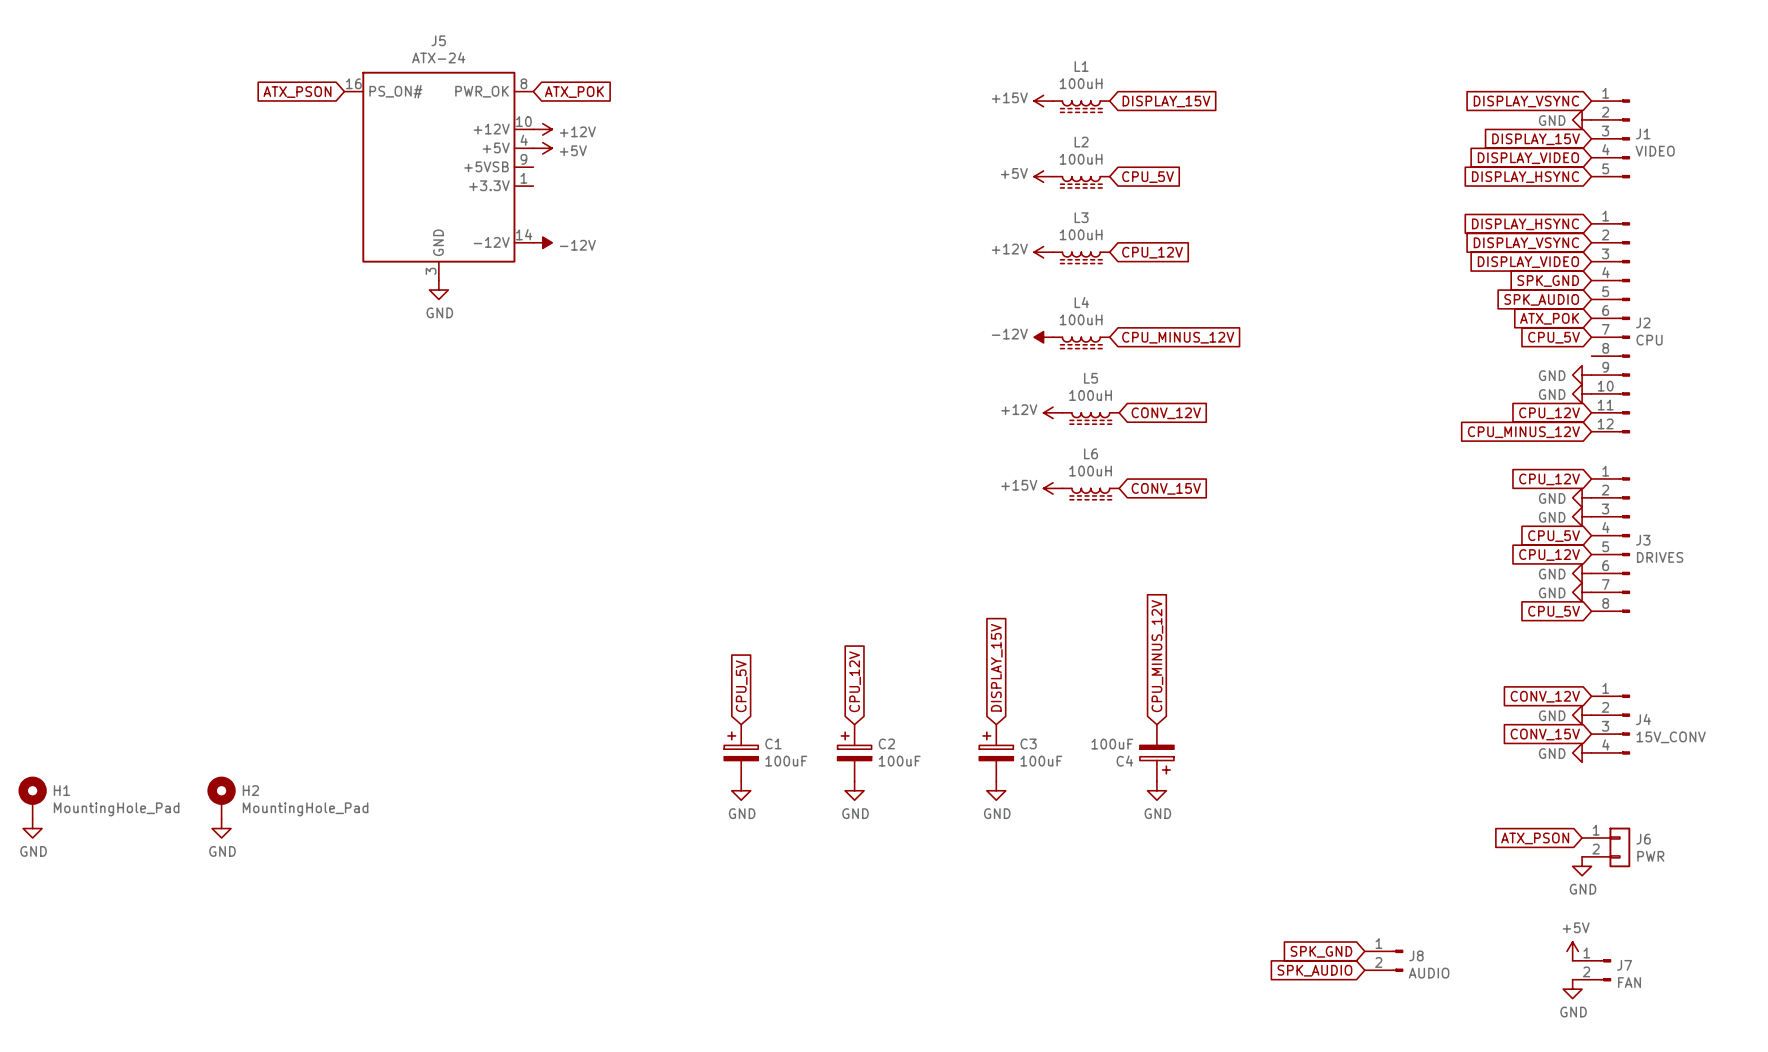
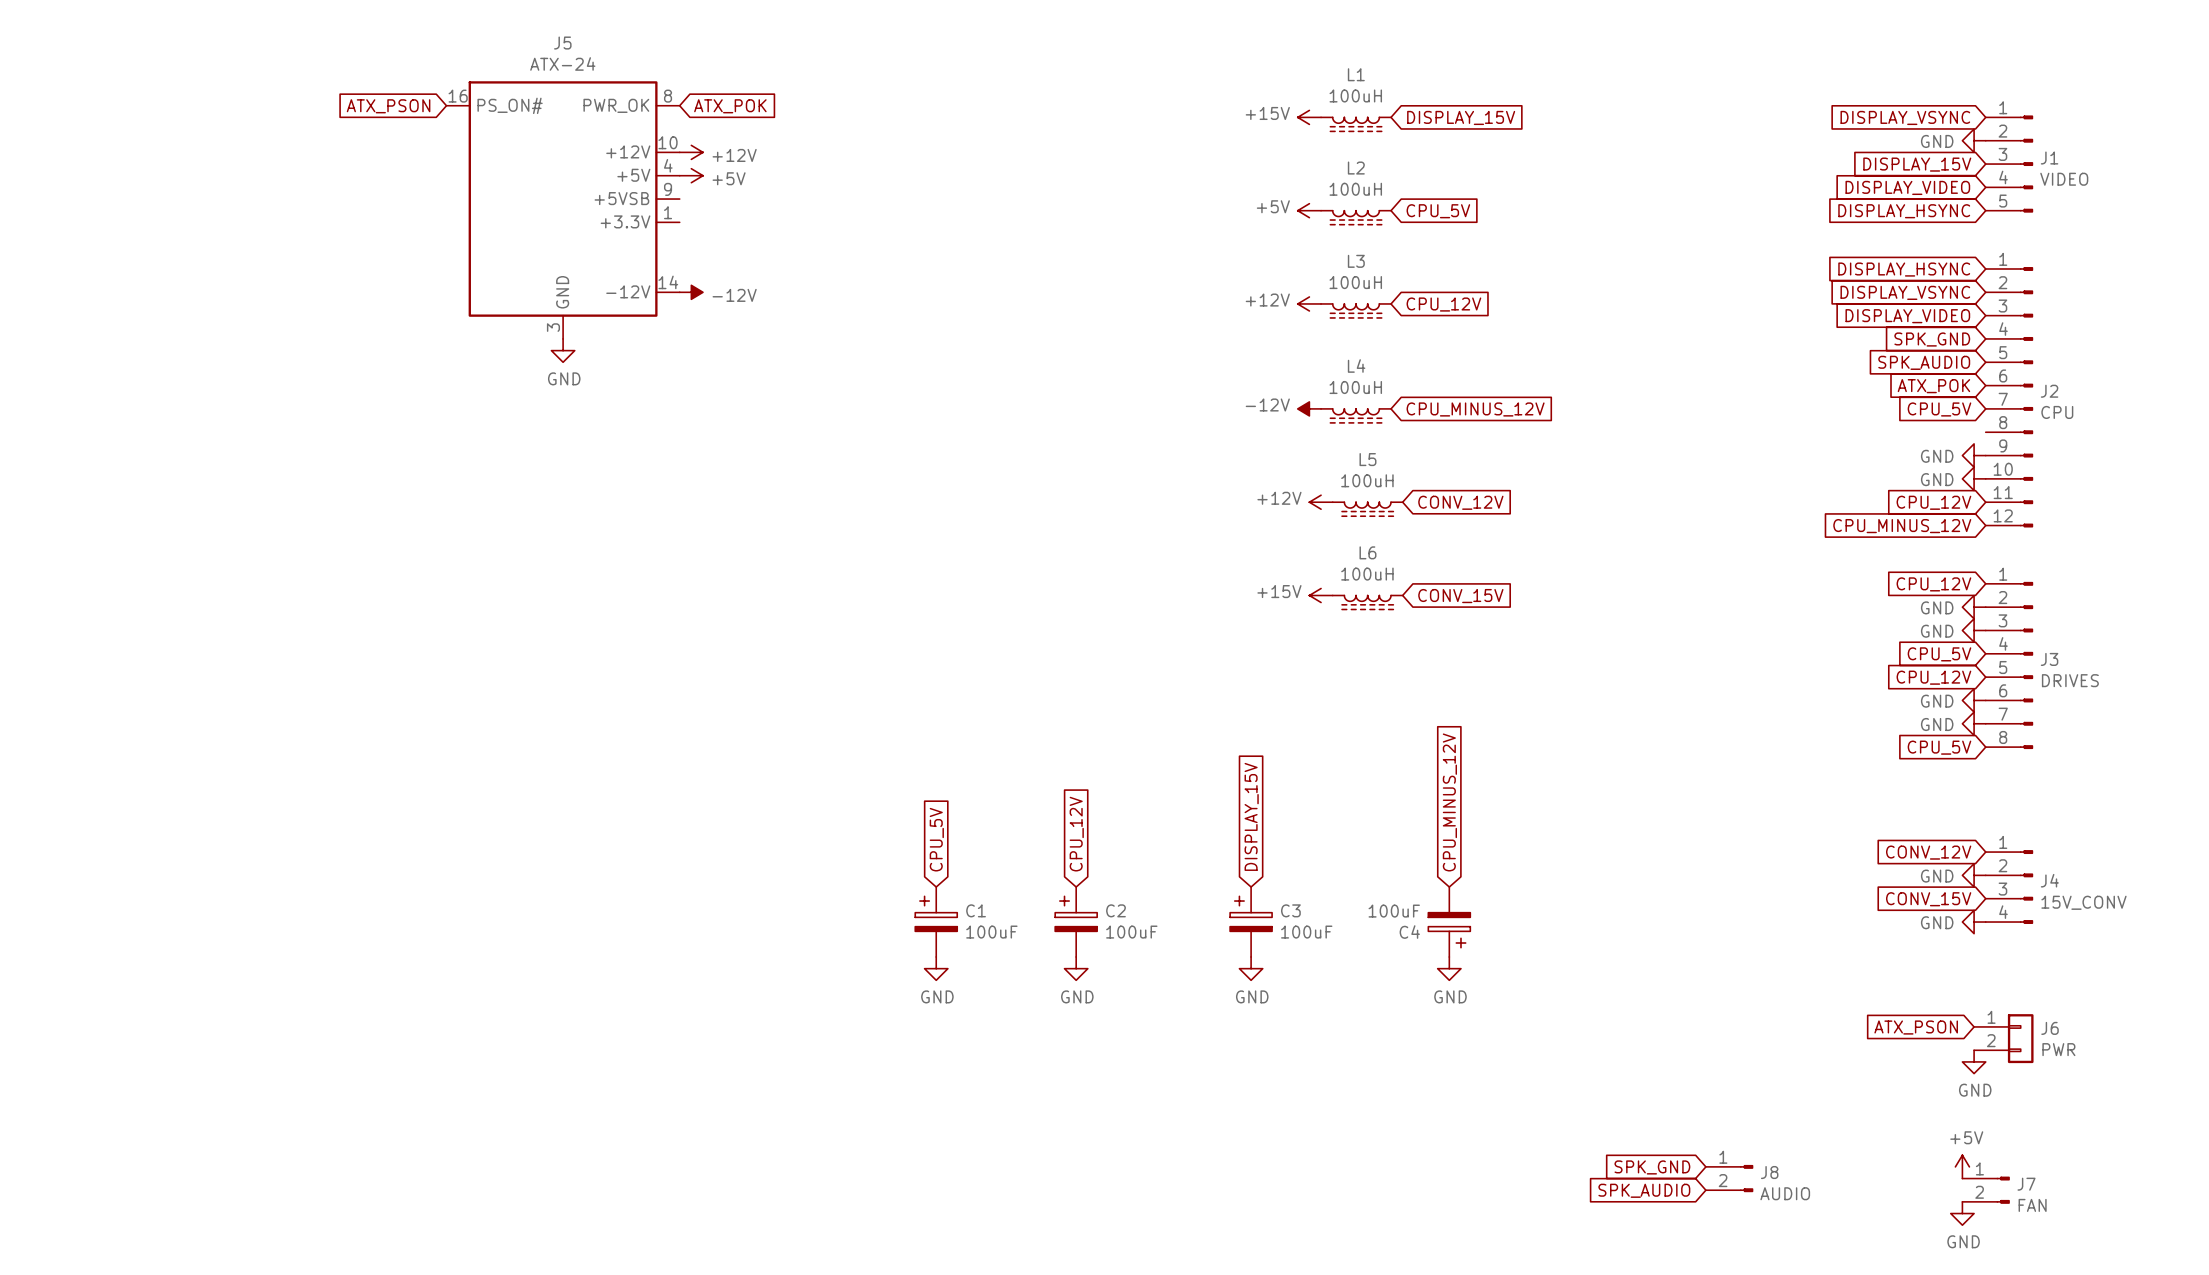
H1: MountingHole_Pad (32, 797) -> none
H2: MountingHole_Pad (221, 797) -> none
power symbol: GND (32, 828) -> none
power symbol: GND (221, 828) -> none

